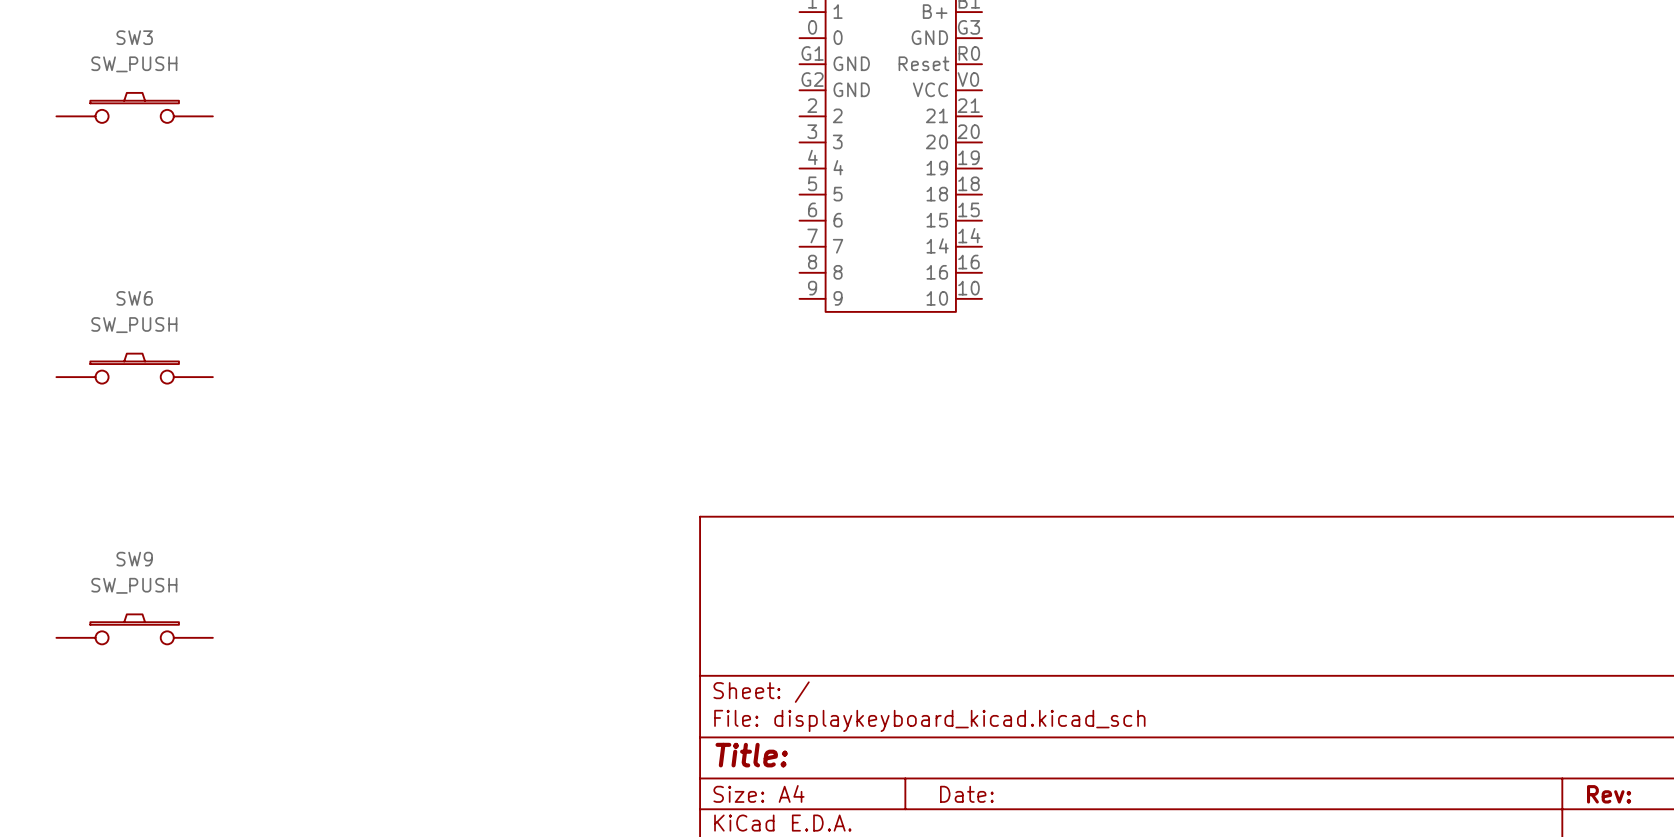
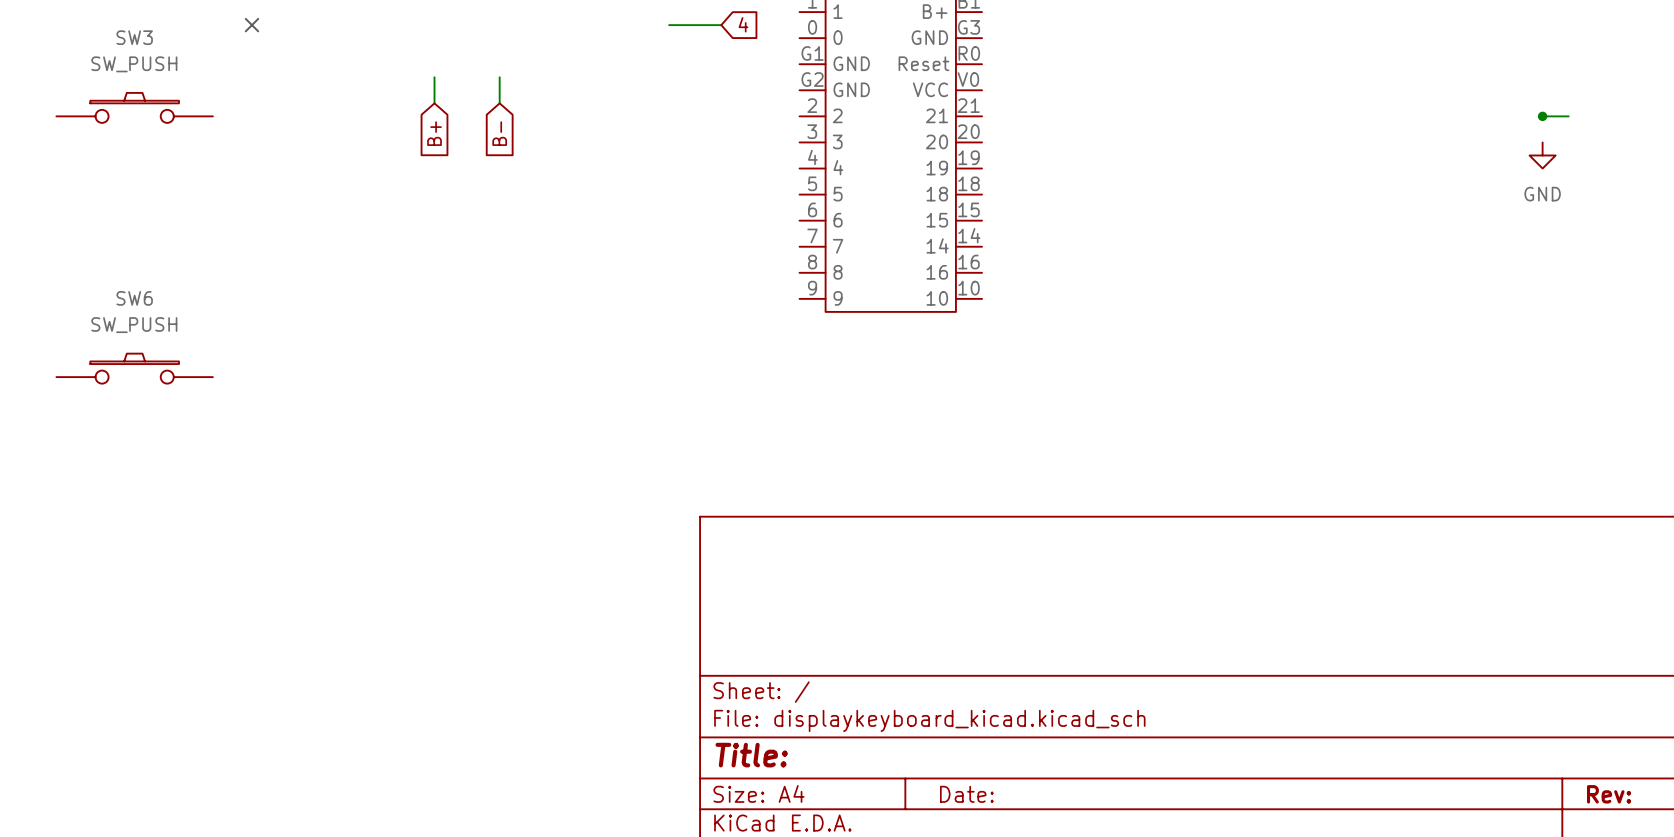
global label: none -> 4 (743, 24)
no-connect mark: none -> (251, 25)
wire: none -> (669, 25) (721, 25)
wire: none -> (434, 77) (434, 103)
wire: none -> (499, 77) (499, 103)
wire: none -> (1542, 116) (1568, 116)
junction: none -> (1542, 116)
global label: none -> B+ (434, 133)
global label: none -> B- (499, 133)
power symbol: none -> GND (1542, 155)
SW9: SW_PUSH (134, 629) -> none

